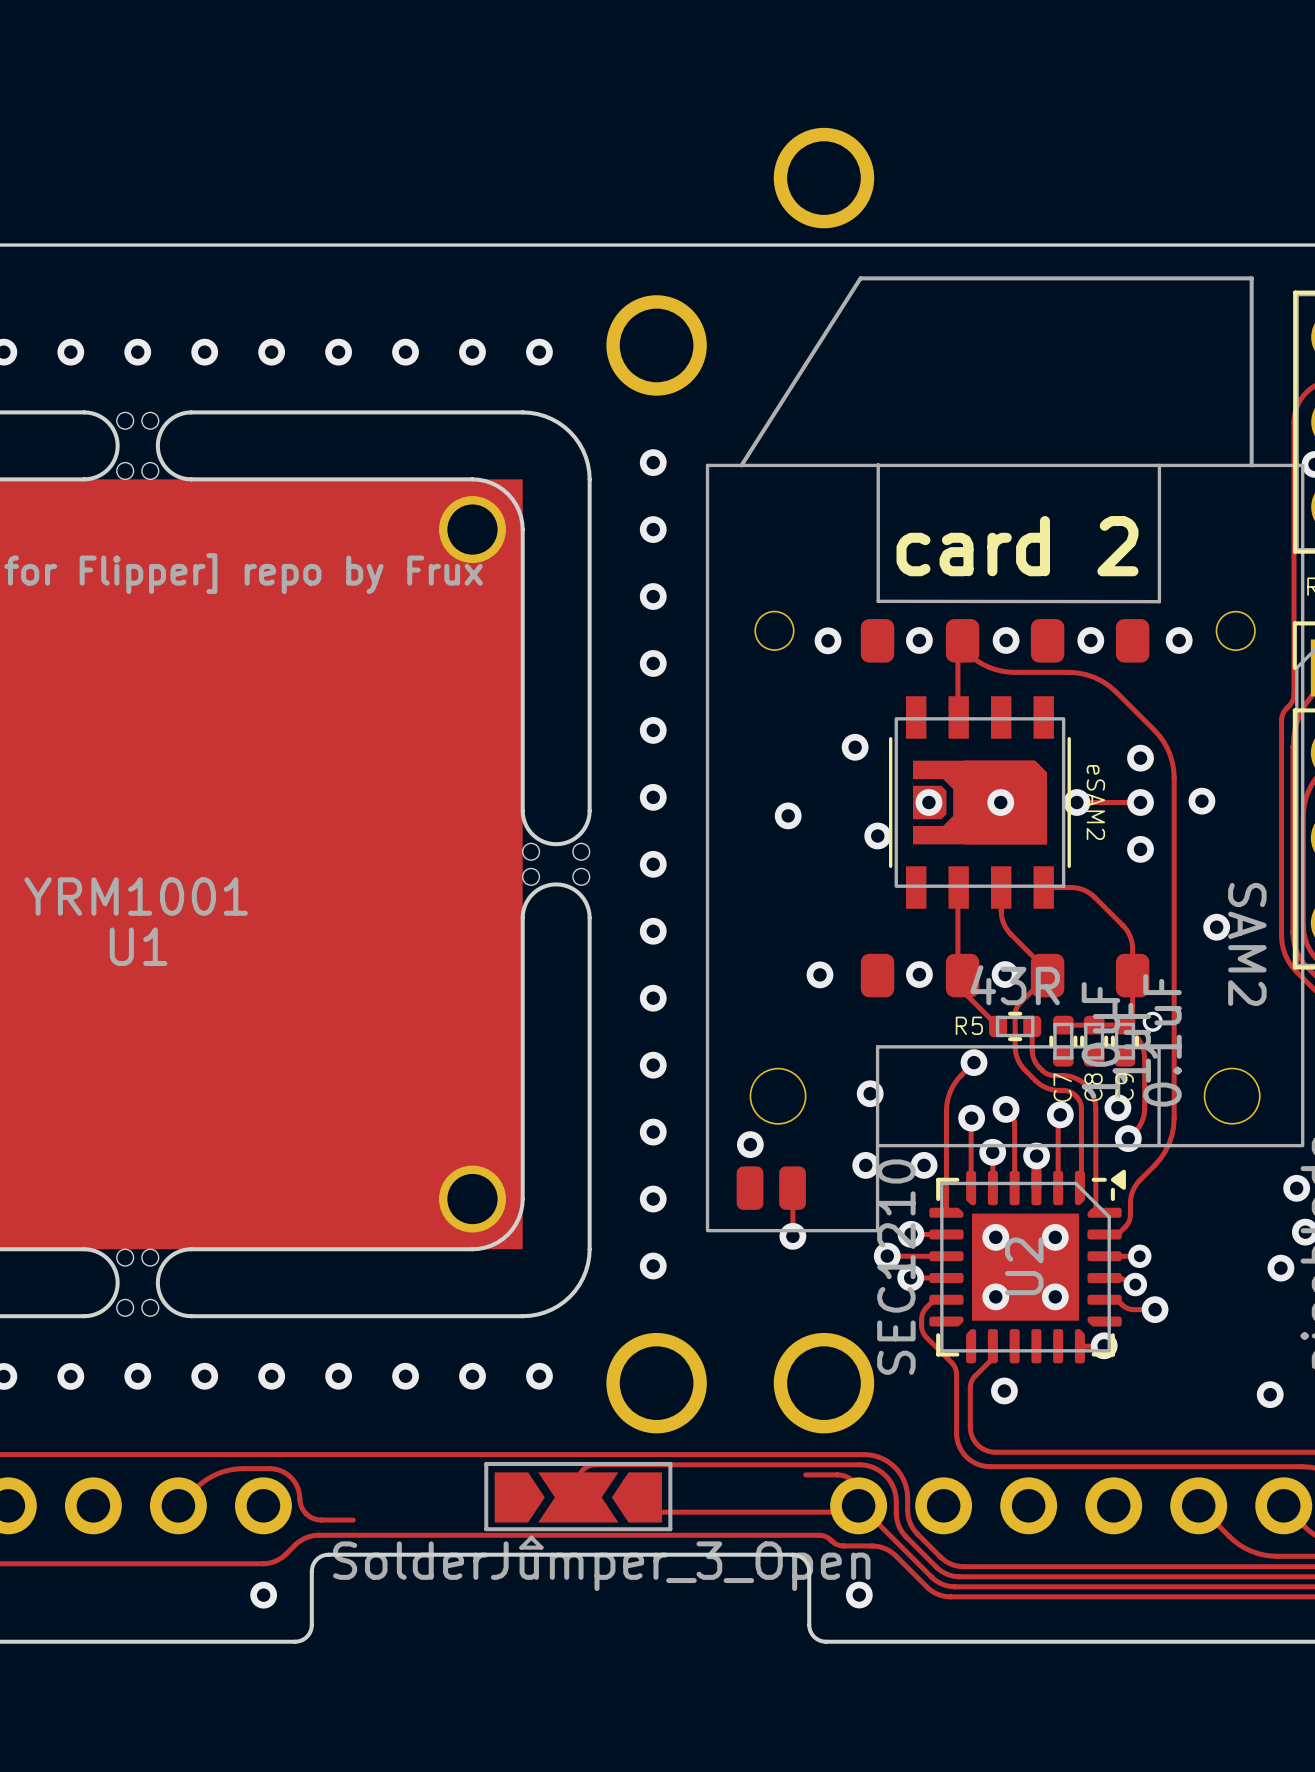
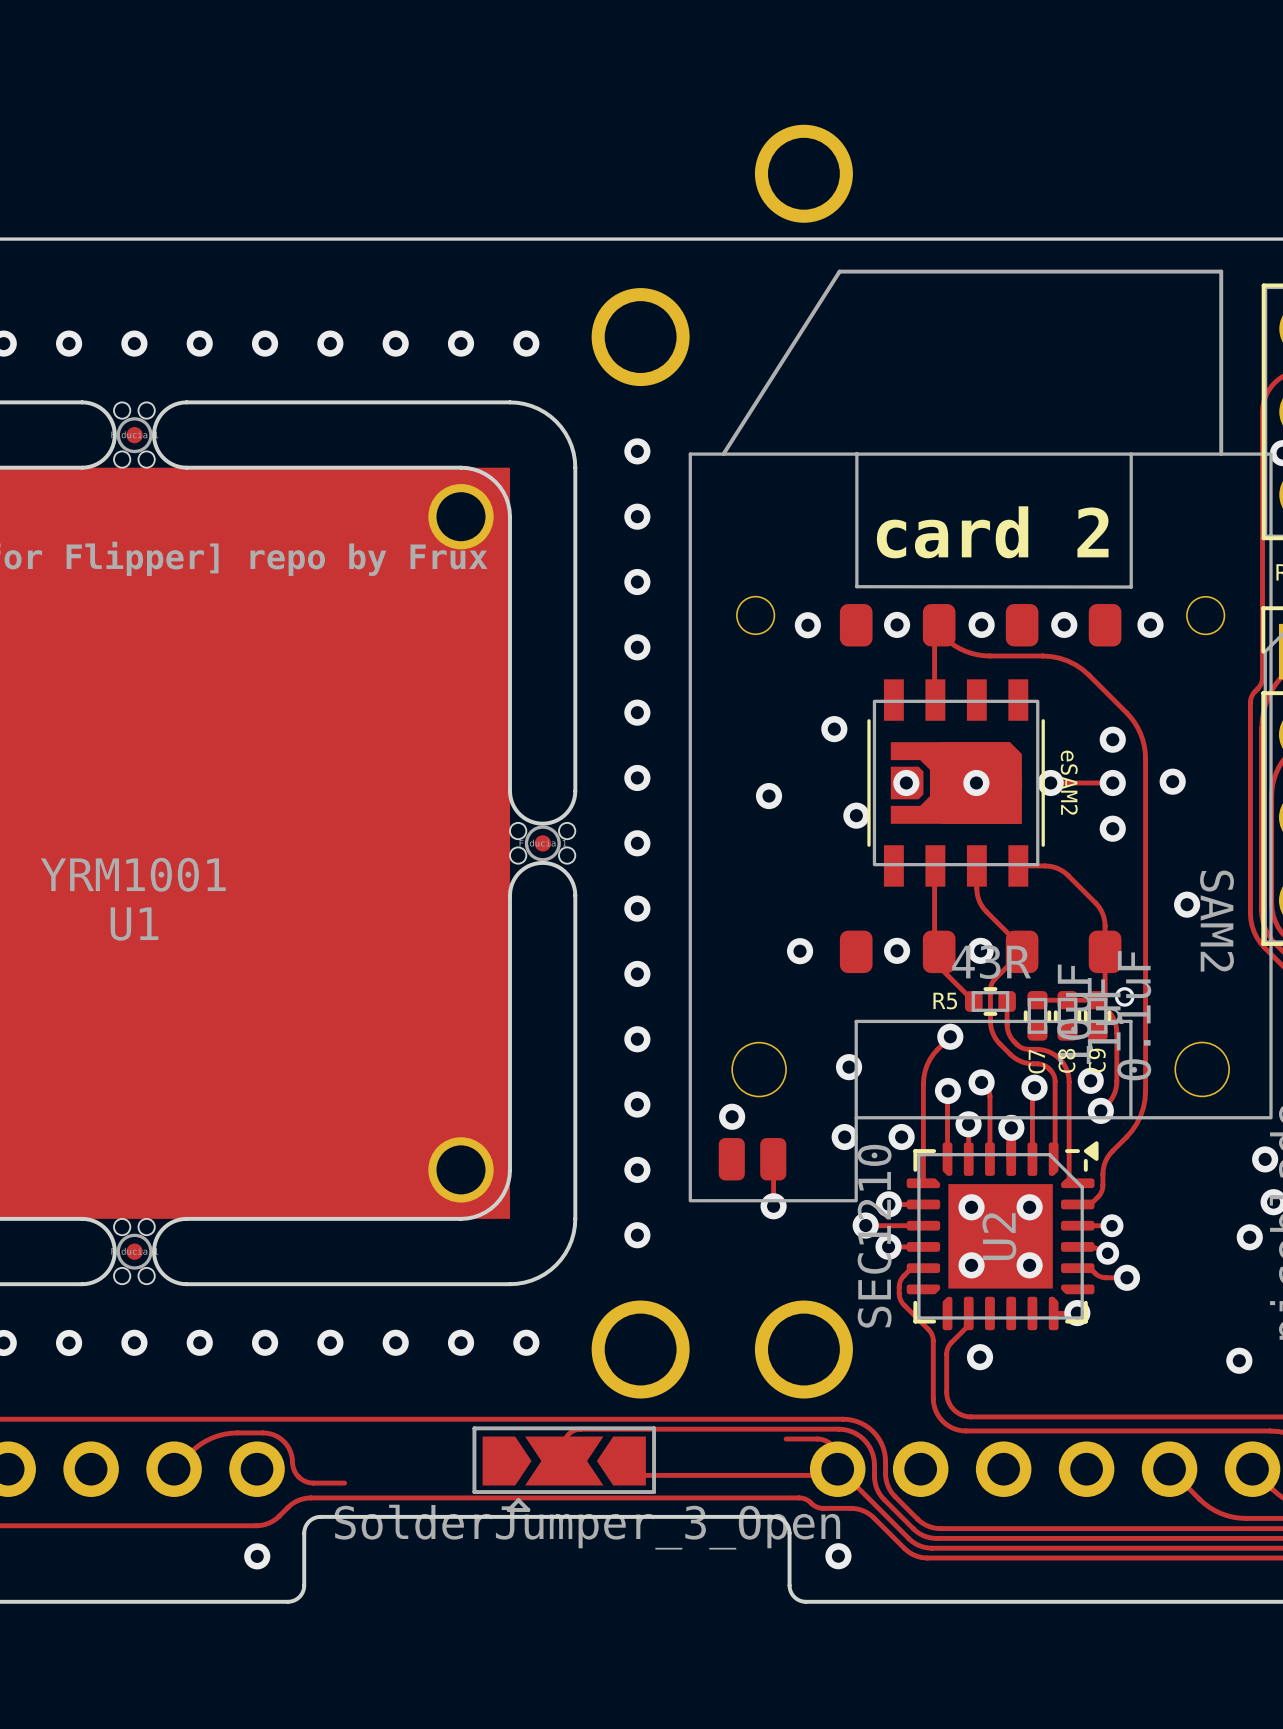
part: none -> (134, 435)
part: none -> (542, 843)
part: none -> (134, 1251)

